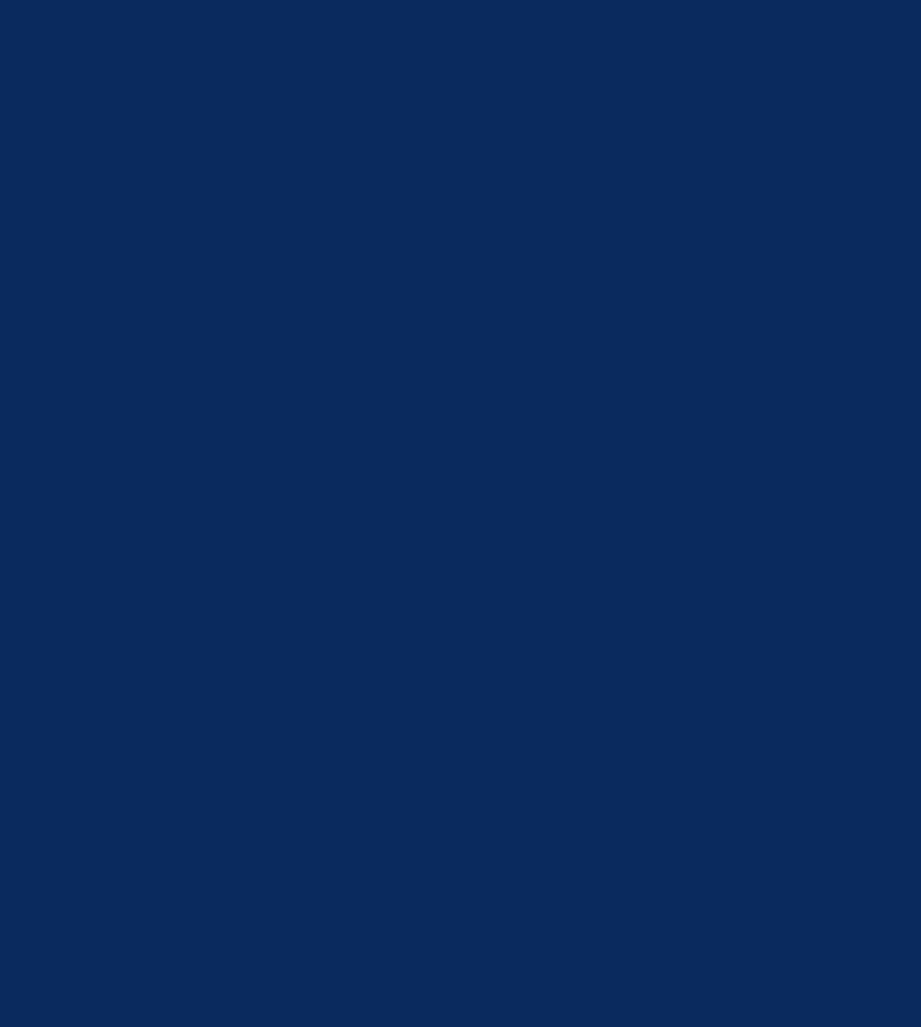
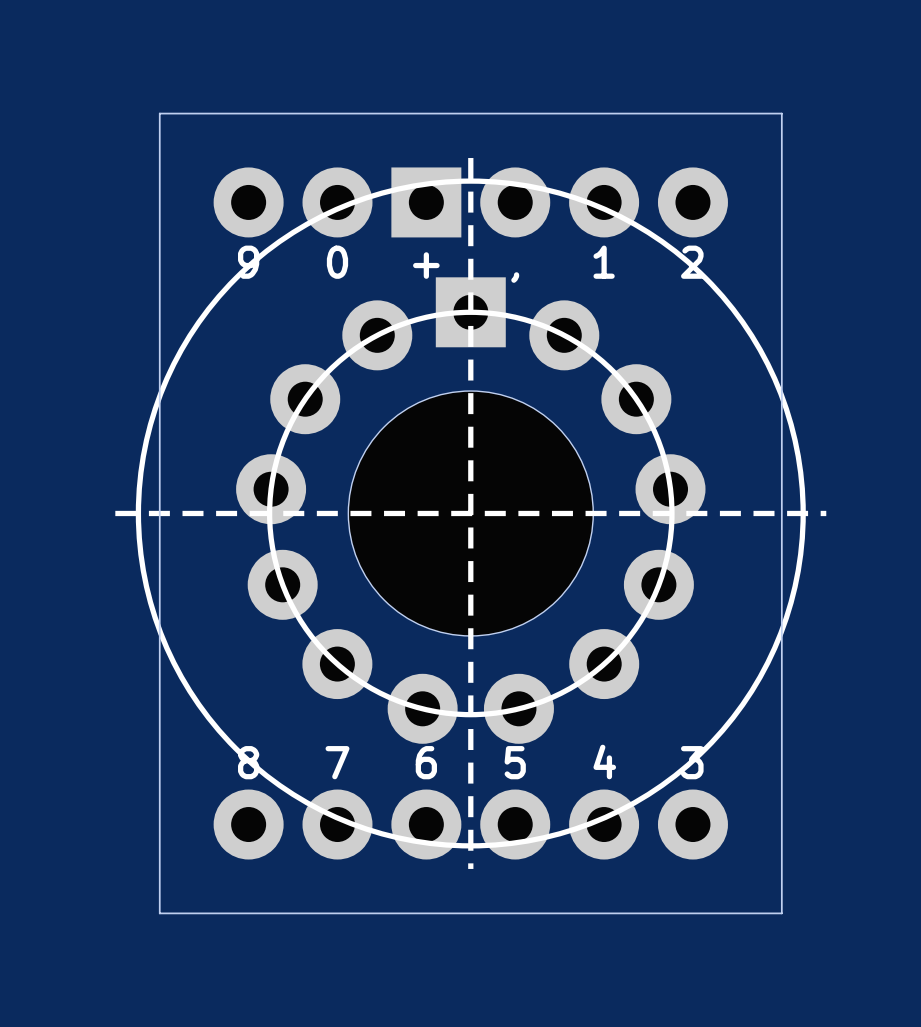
board edge: none -> (159, 113) (781, 113) (781, 913) (159, 913) (159, 113)
part: none -> (470, 202)
part: none -> (470, 513)
part: none -> (470, 824)

